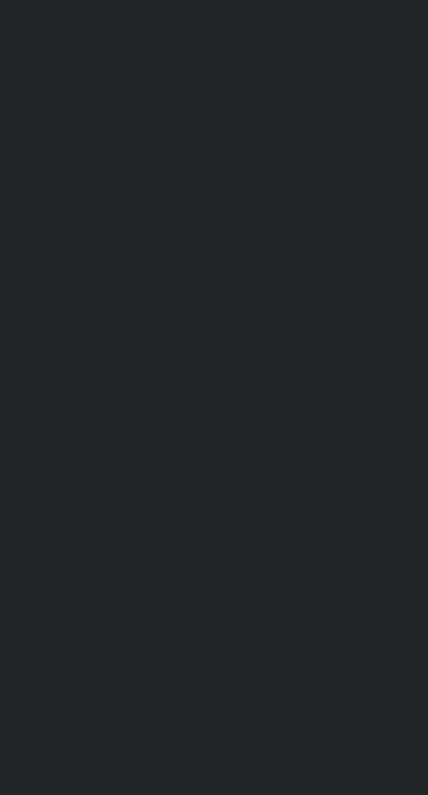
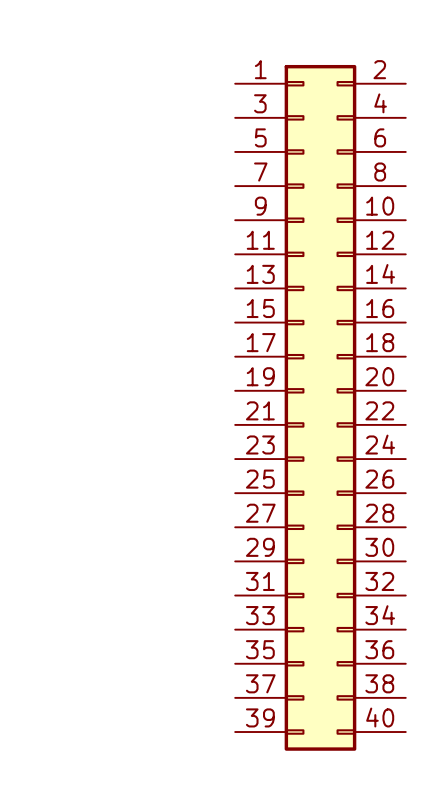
part: none -> (320, 407)

